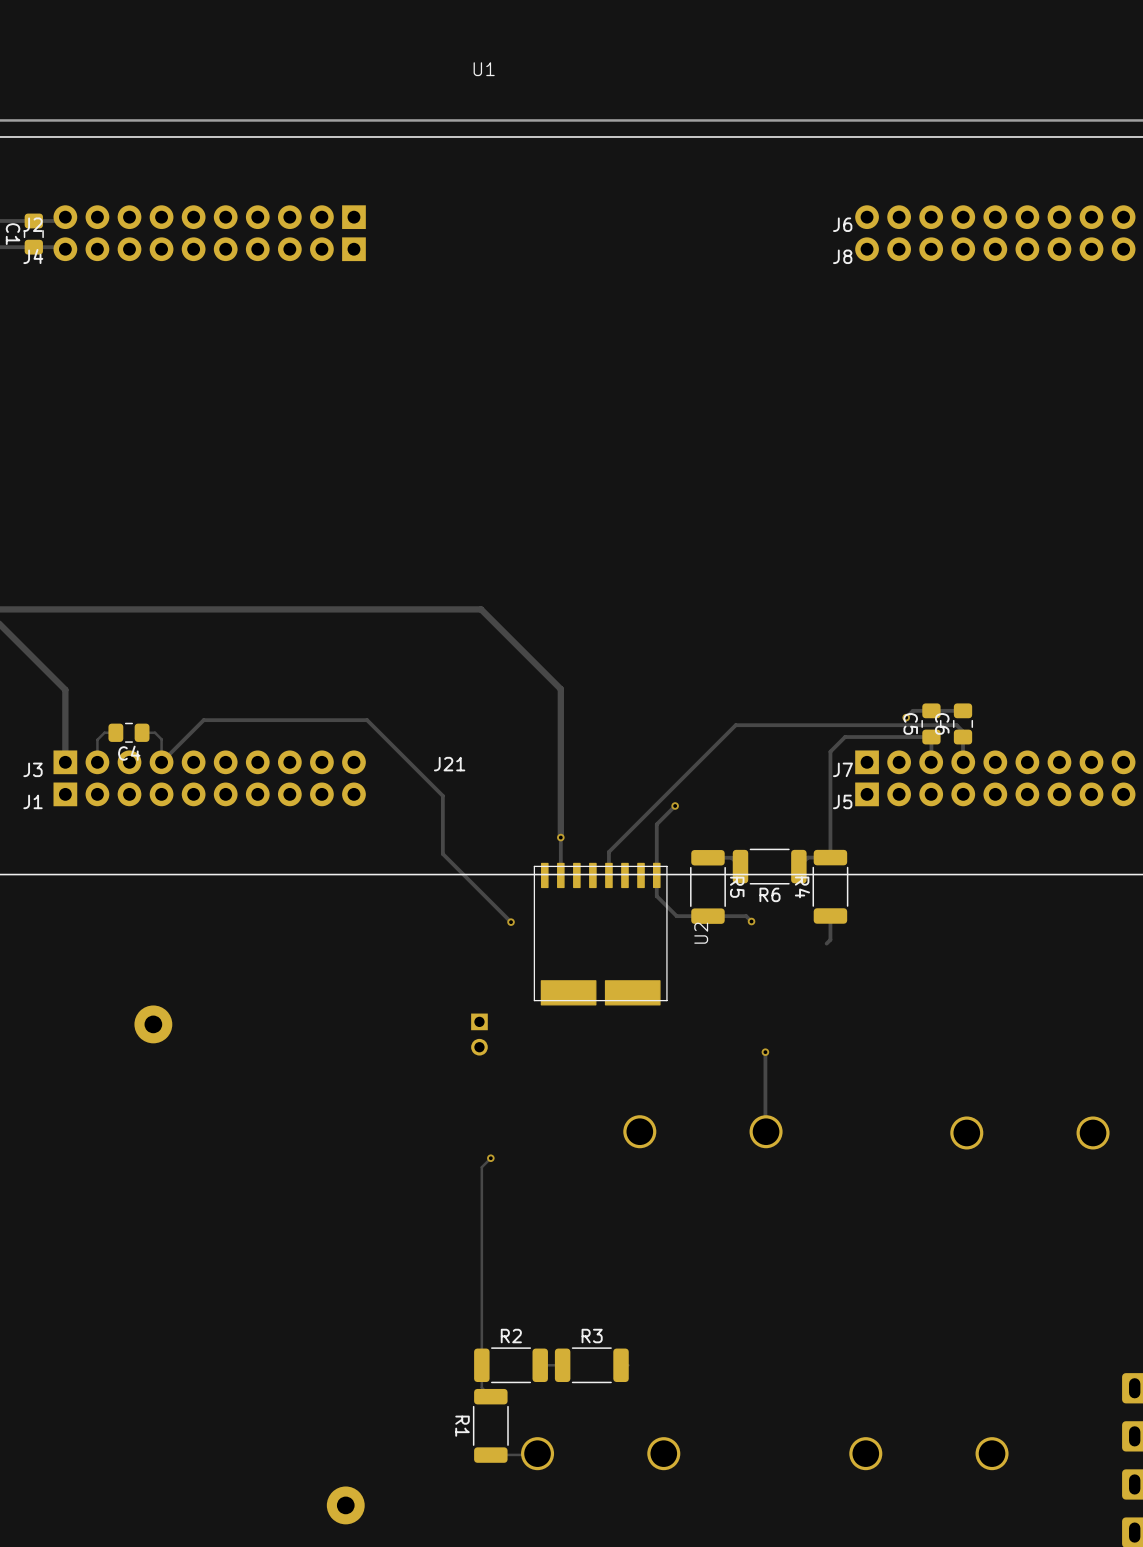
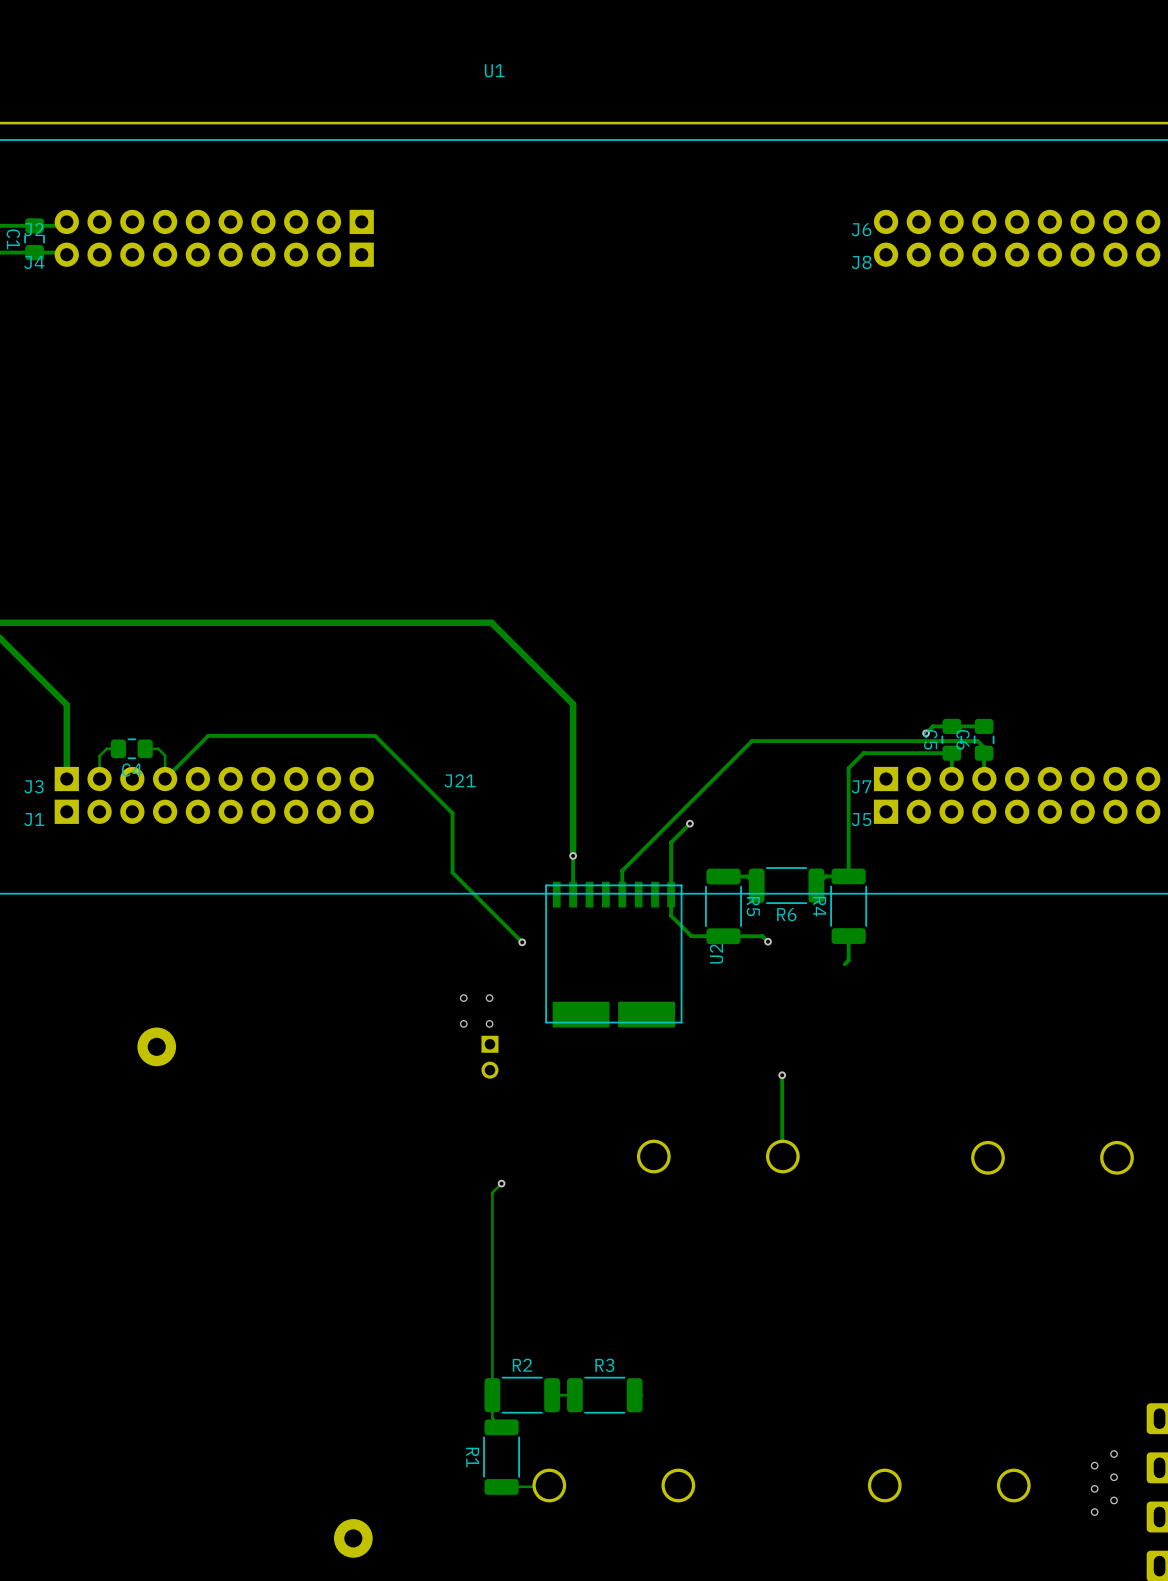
via: none -> (463, 998)
via: none -> (489, 998)
via: none -> (463, 1023)
via: none -> (489, 1023)
via: none -> (1114, 1454)
via: none -> (1094, 1465)
via: none -> (1114, 1477)
via: none -> (1094, 1488)
via: none -> (1114, 1500)
via: none -> (1094, 1512)

